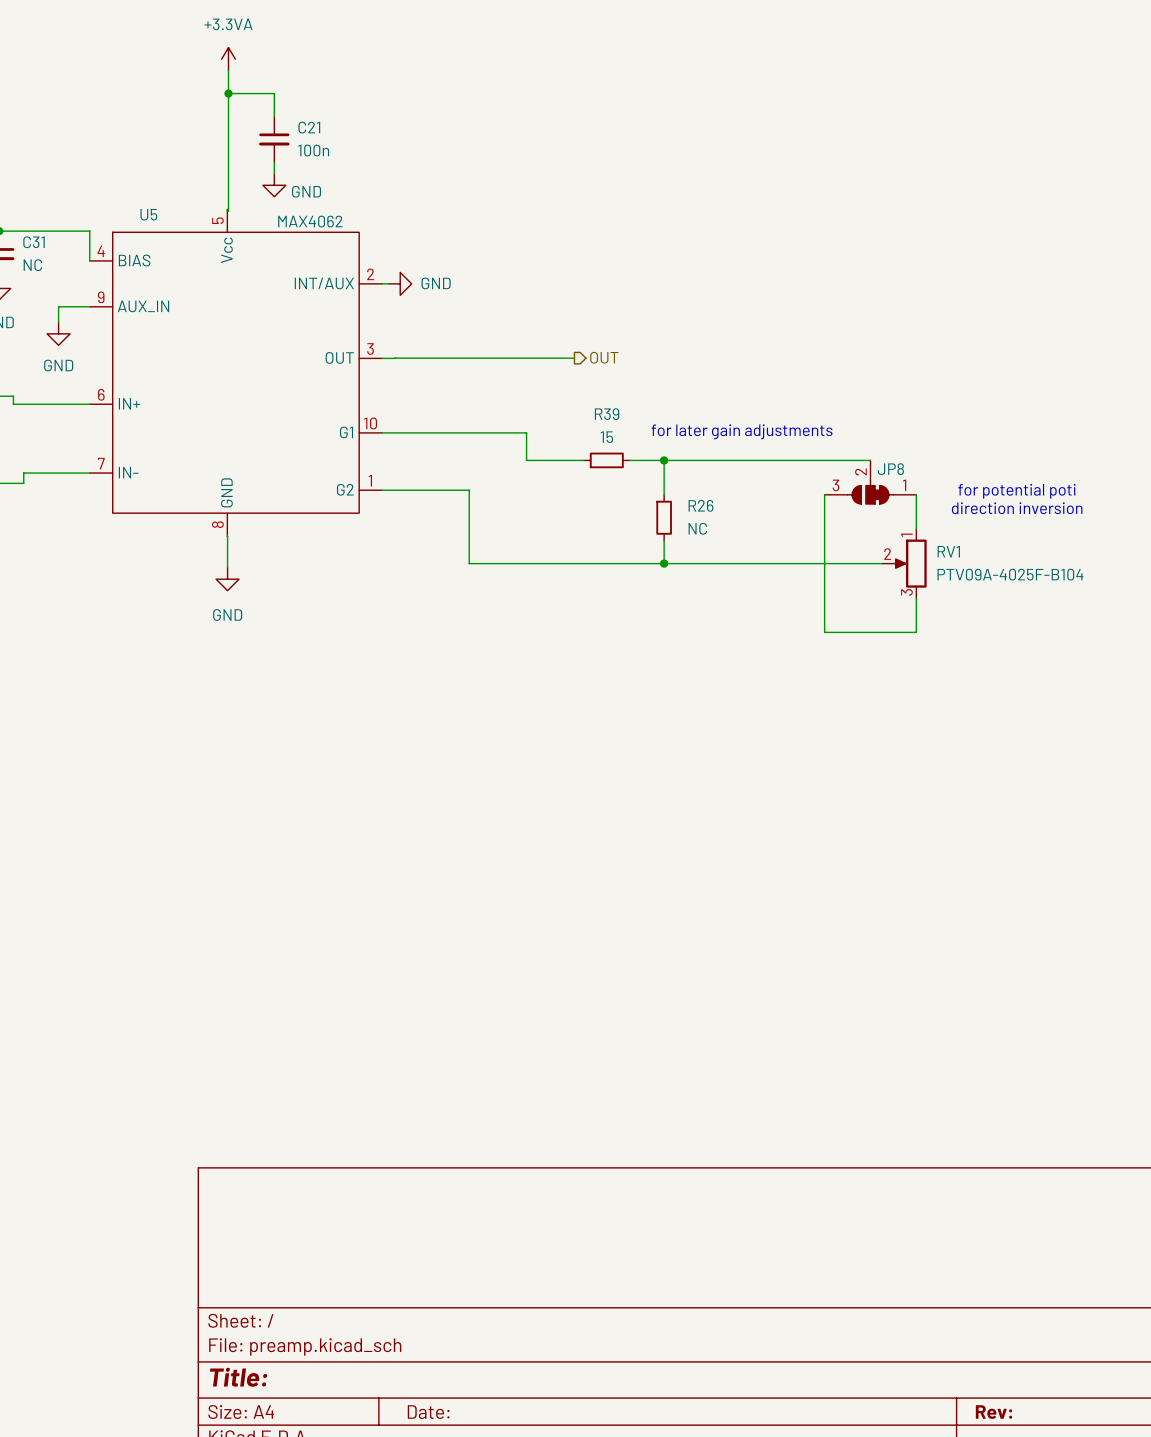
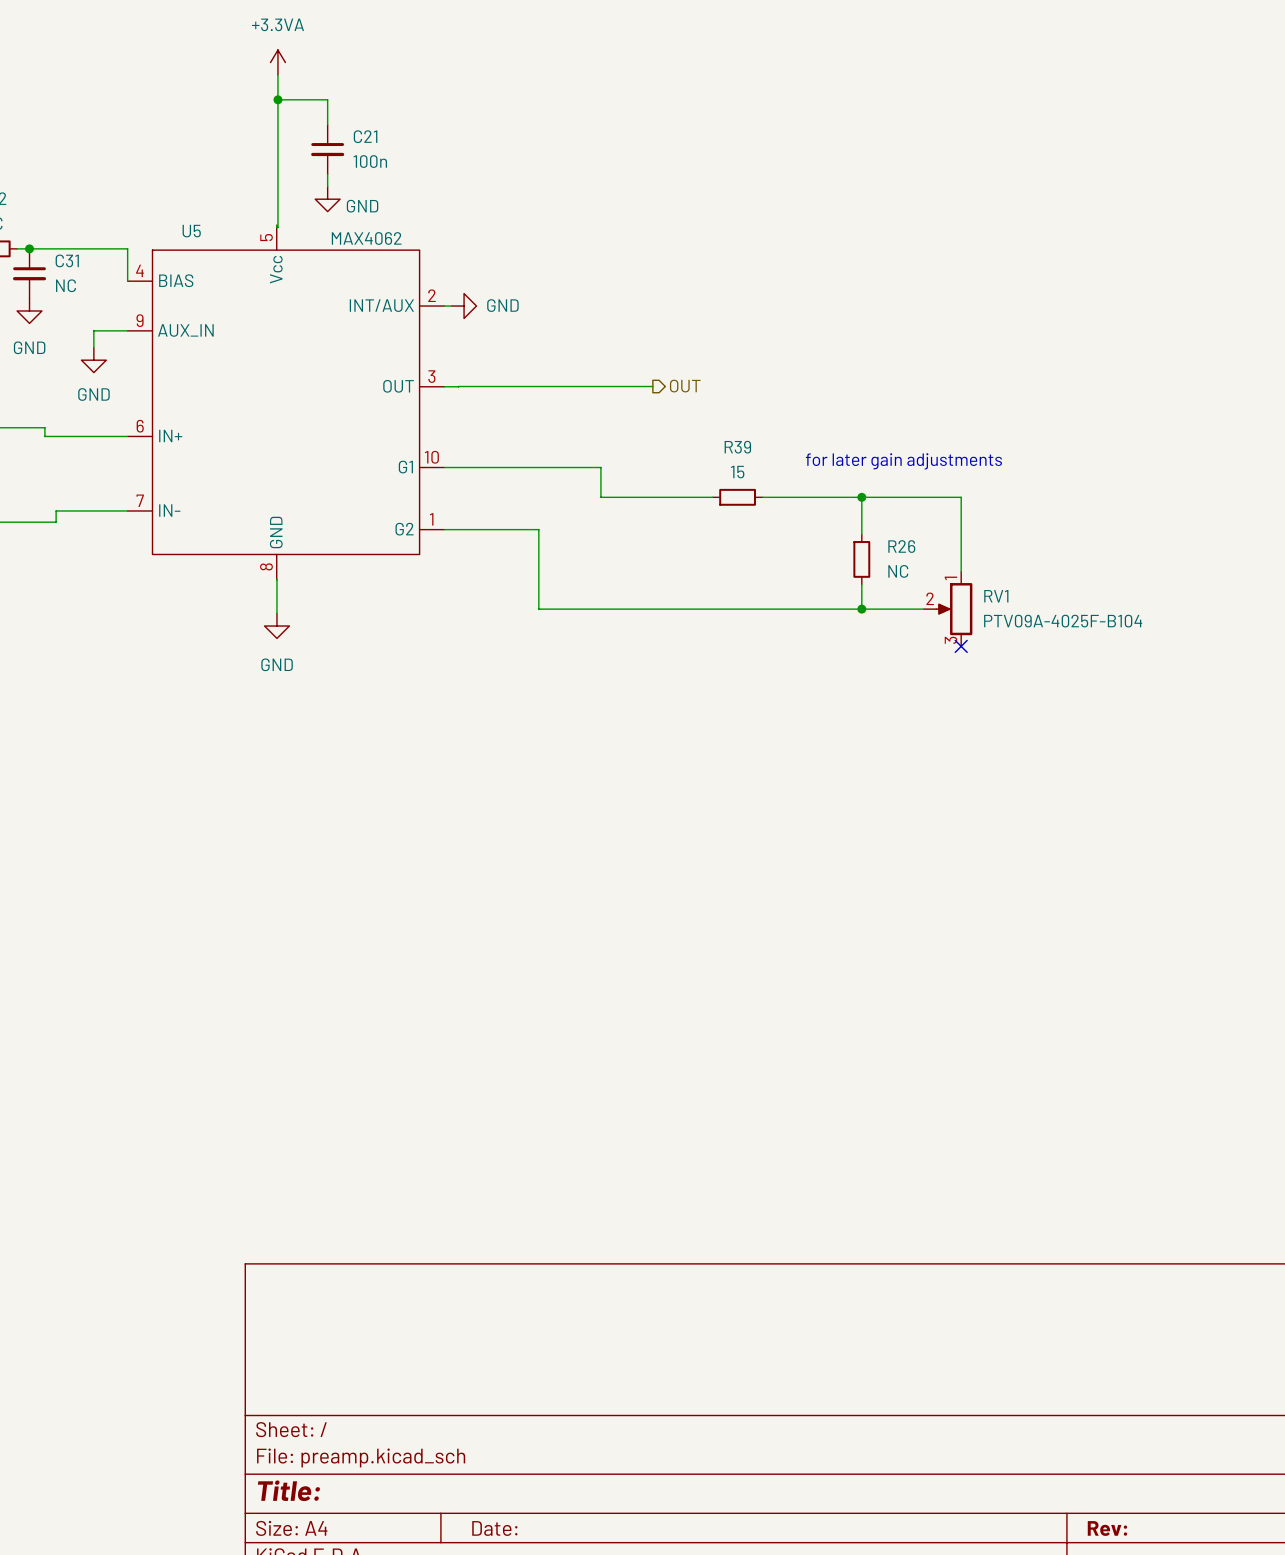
text position: for later gain adjustments (741, 431) -> for later gain adjustments (903, 461)
R39 position: (606, 460) -> (737, 497)
wire: (629, 460) (675, 460) -> (712, 497) (663, 497)
wire: (664, 460) (664, 494) -> (861, 497) (861, 534)
junction: (664, 460) -> none
junction: none -> (861, 497)
wire: (859, 460) (870, 460) -> (961, 497) (961, 571)
JP8: (870, 482) -> none
text: for potential poti (1016, 491) -> none
wire: (824, 494) (824, 632) (916, 632) (916, 597) -> none
wire: (916, 494) (916, 529) -> none
text: direction inversion (1017, 508) -> none
R26 position: (664, 517) -> (861, 559)
wire: (664, 540) (664, 563) -> (861, 584) (861, 609)
junction: (664, 563) -> none
junction: none -> (861, 609)
wire: (824, 563) (881, 563) -> none
RV1 position: (904, 563) -> (948, 609)
no-connect mark: none -> (961, 646)

